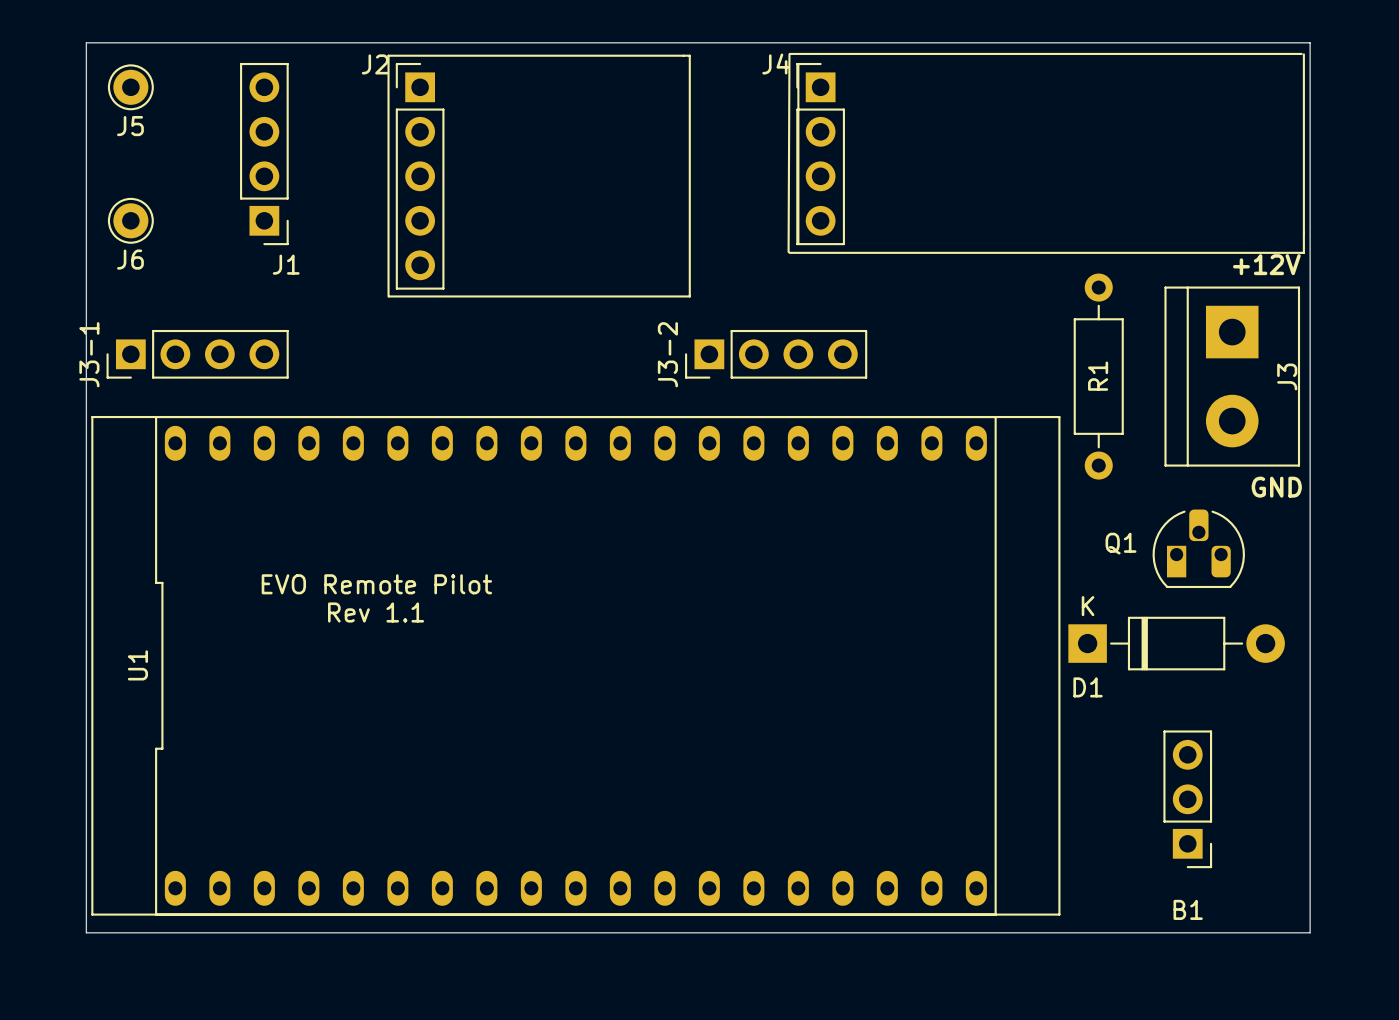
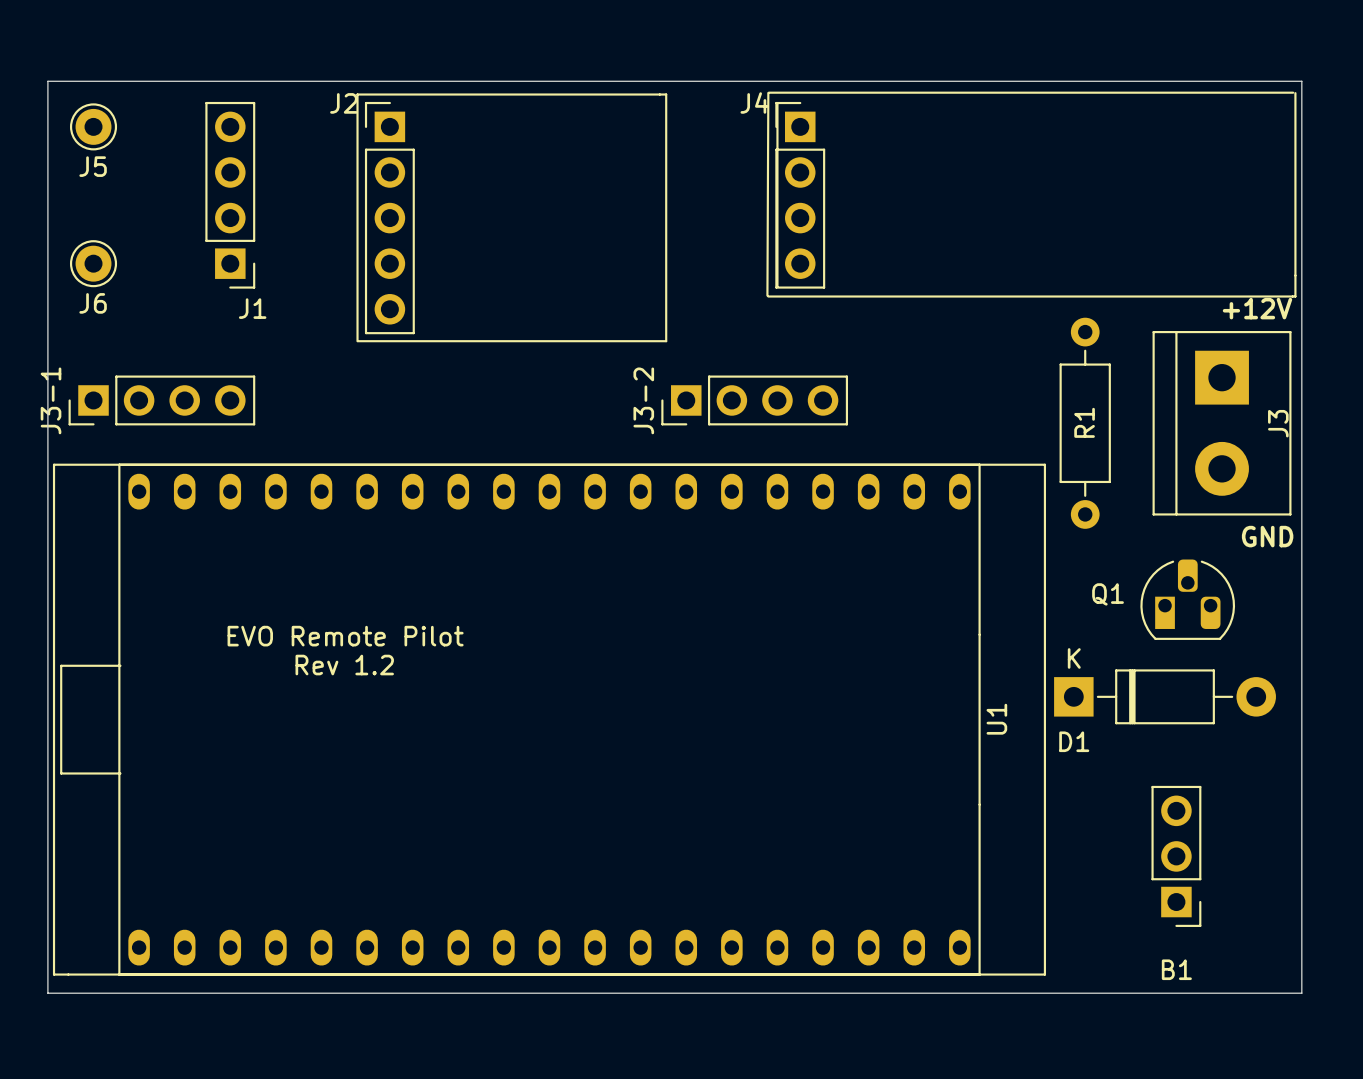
U1 footprint: [91, 415, 1061, 916] -> [52, 463, 1047, 976]
text: Rev 1.1 (376, 612) -> Rev 1.2 (344, 665)
U1 name position: U1 (137, 665) -> U1 (996, 719)

